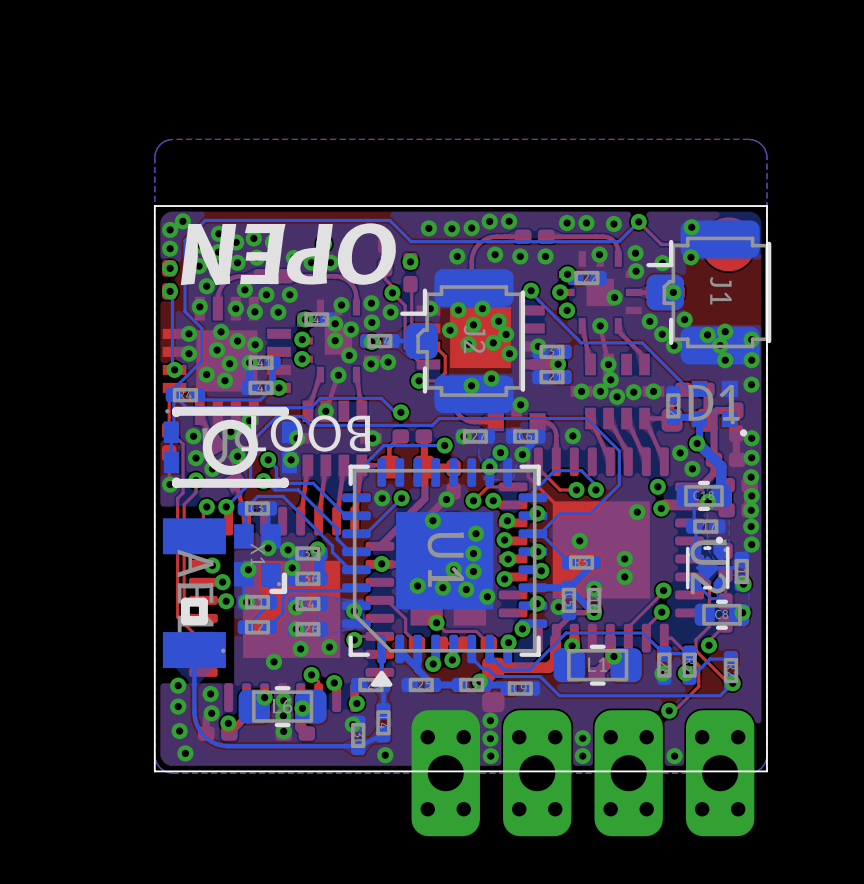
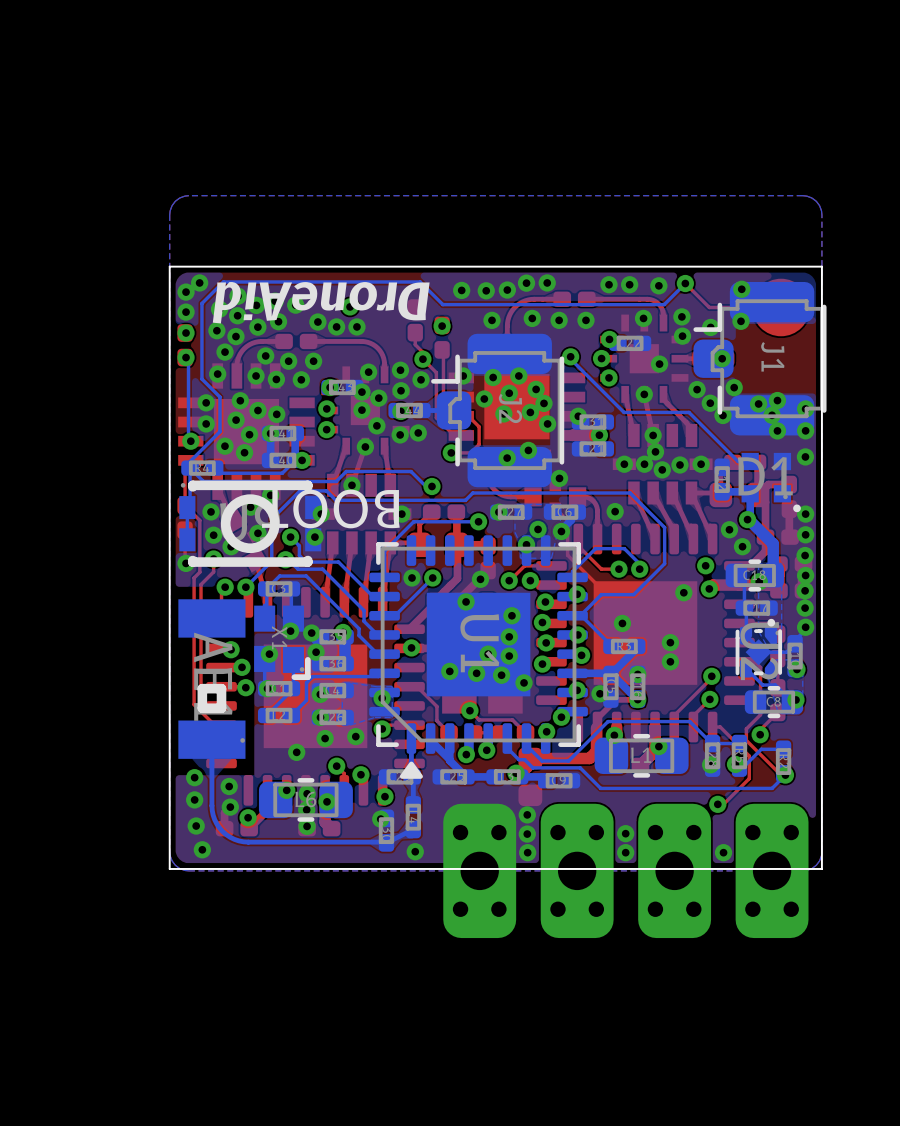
text: OPEN (288, 254) -> DroneAid (321, 302)

